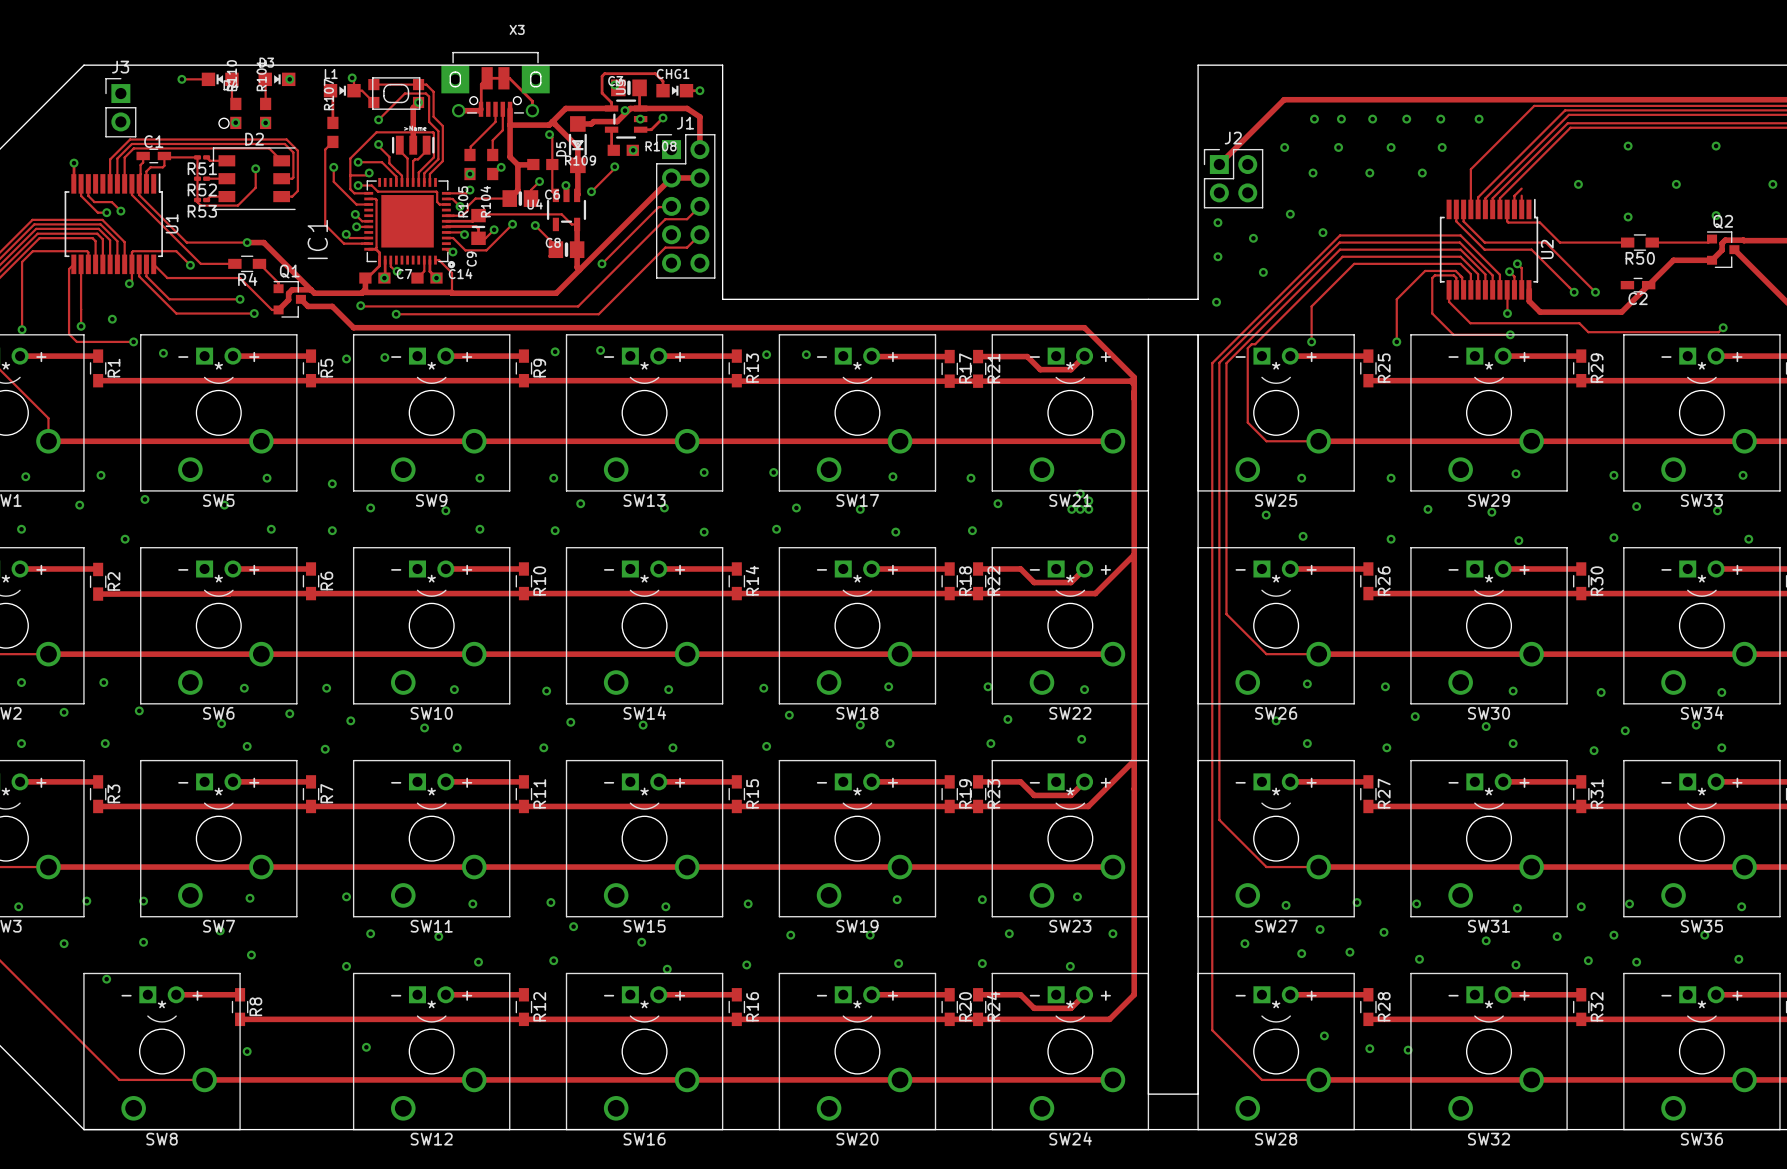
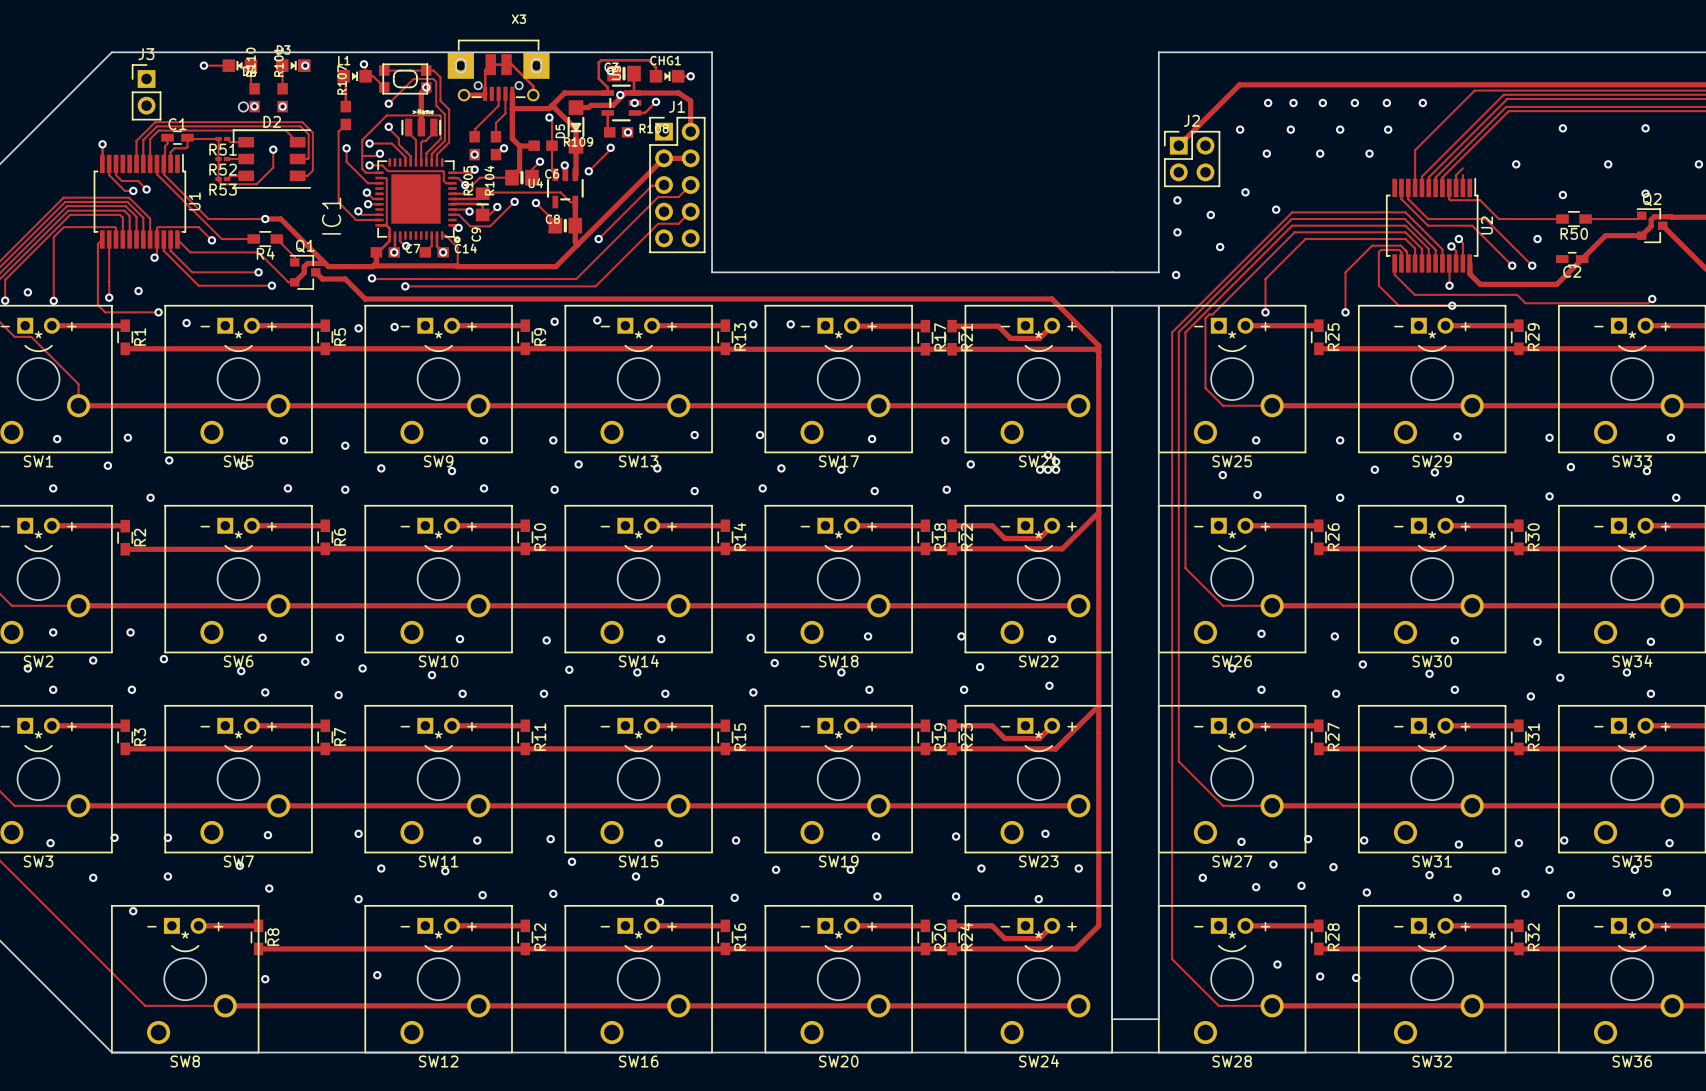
via: none -> (1537, 239)

